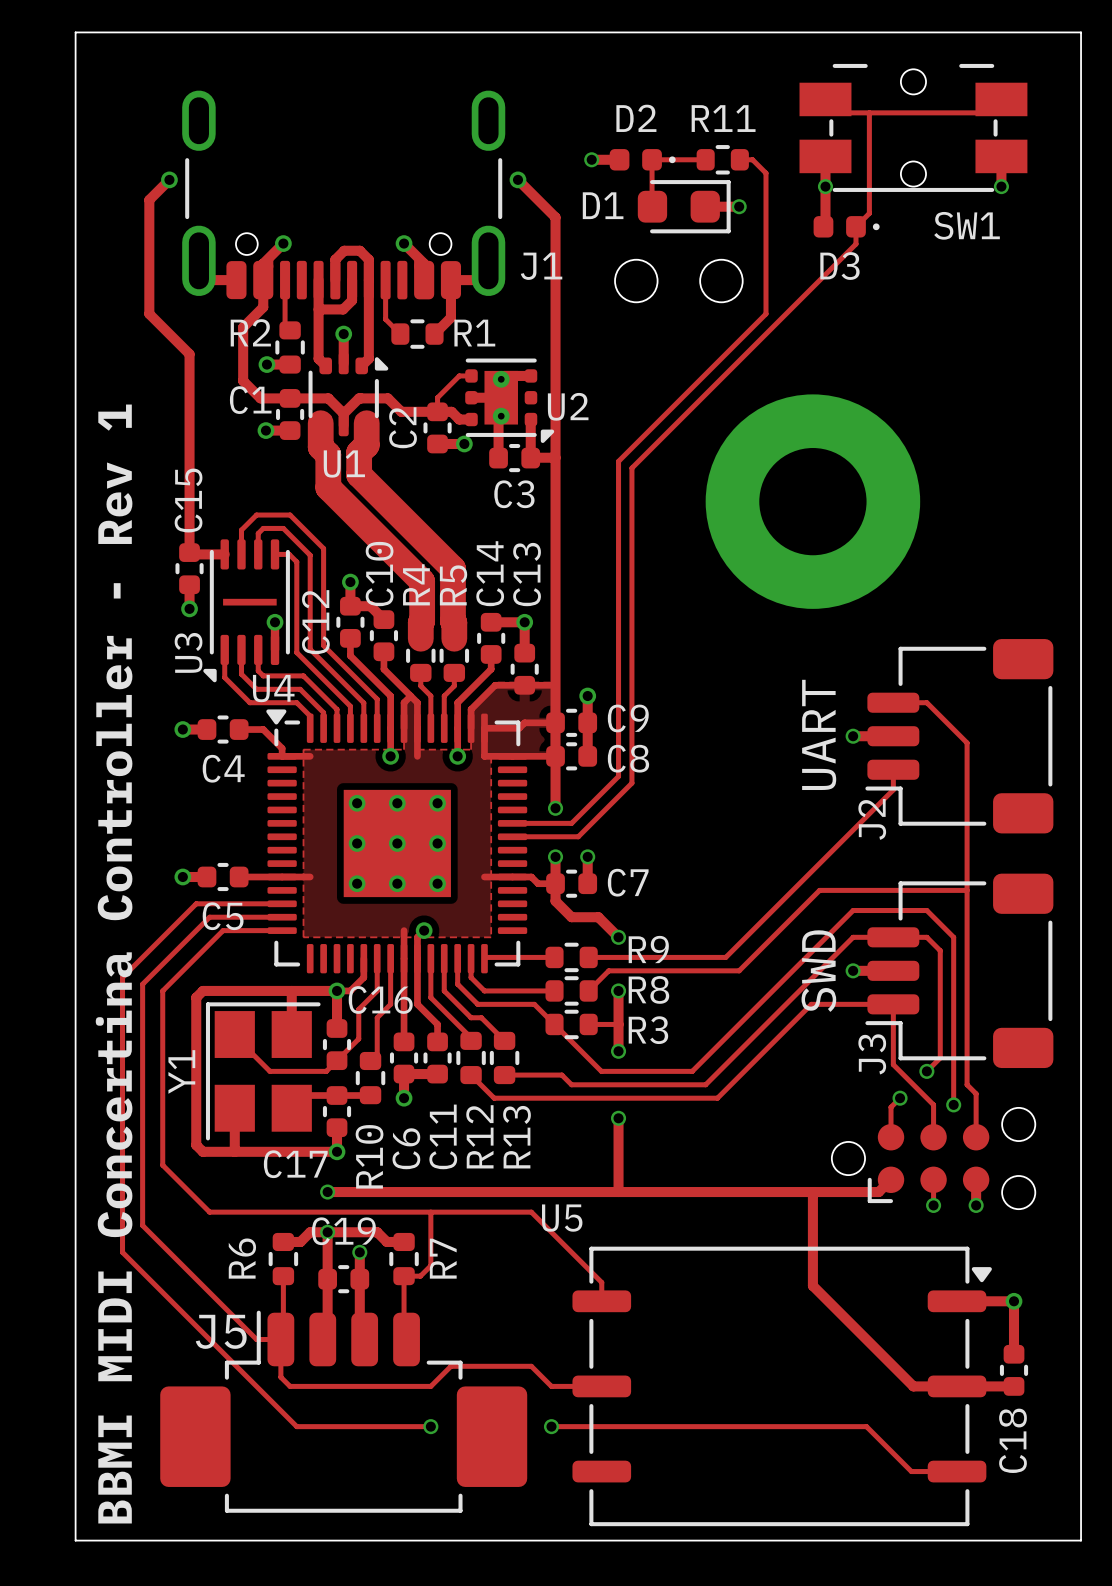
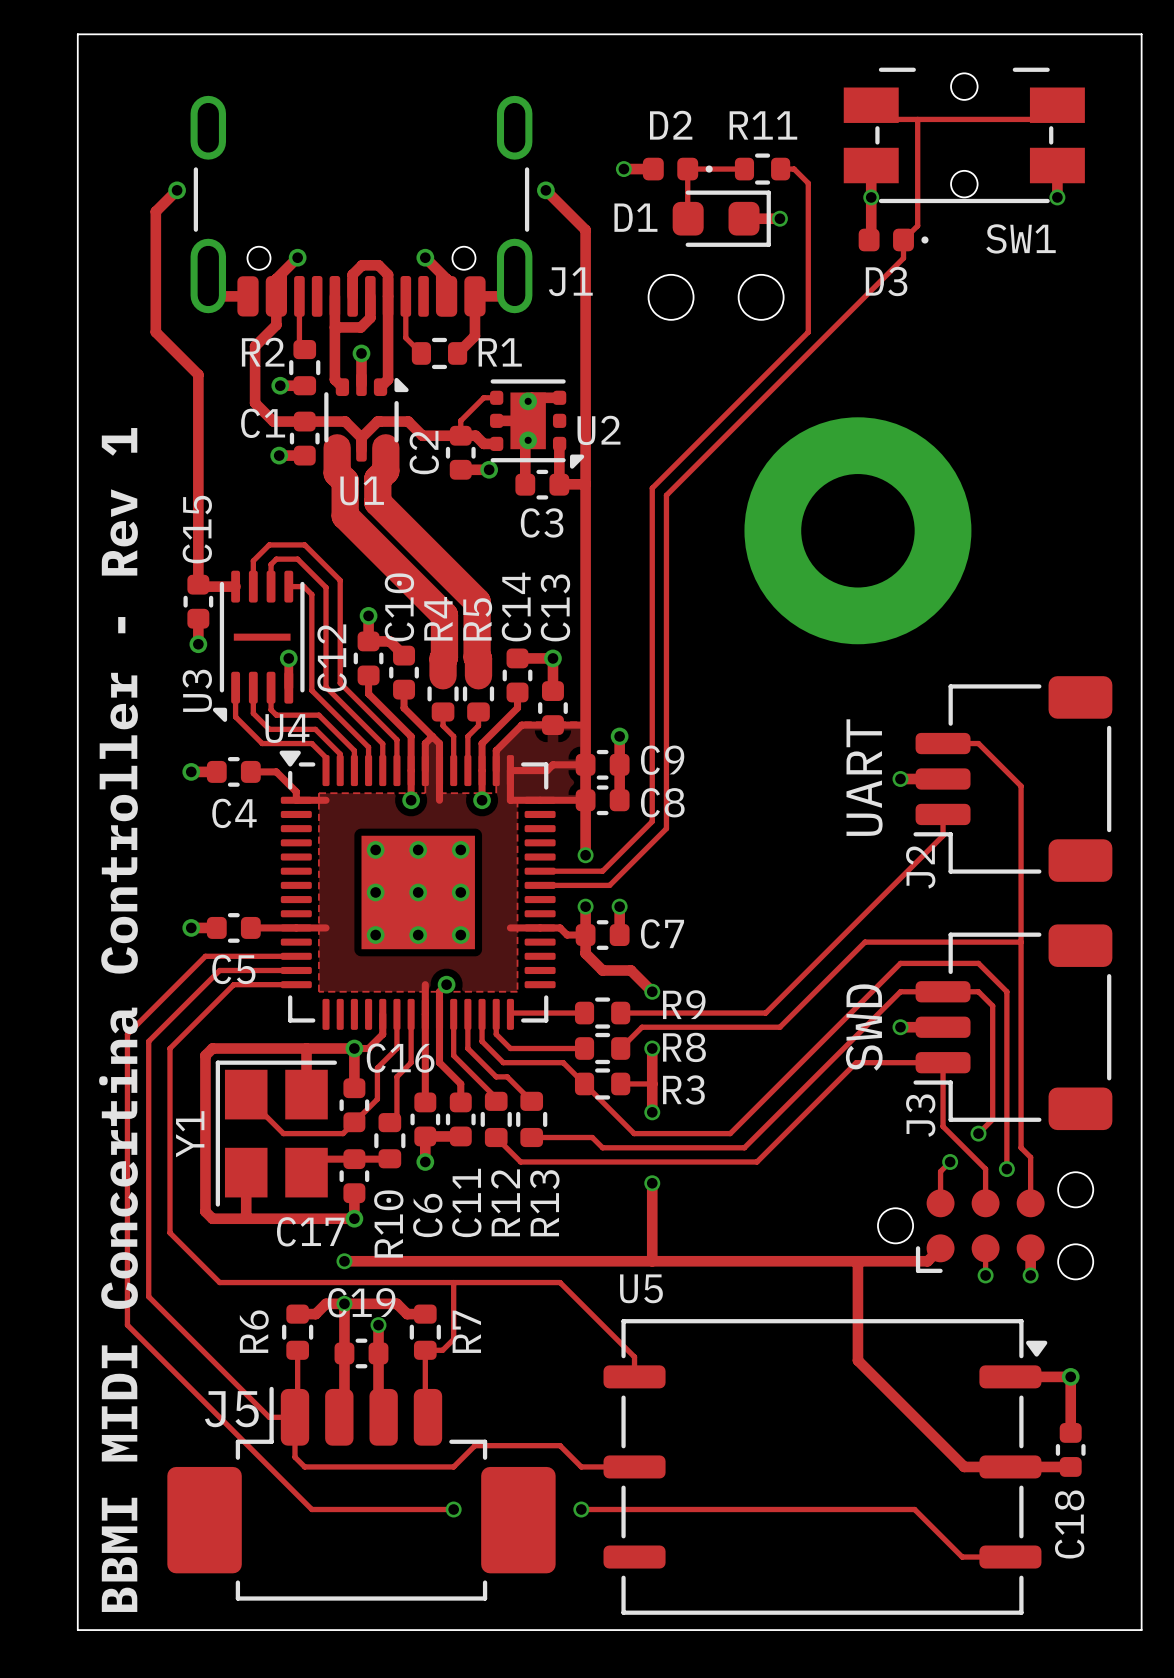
U5 name position: U5 (562, 1218) -> U5 (641, 1288)

